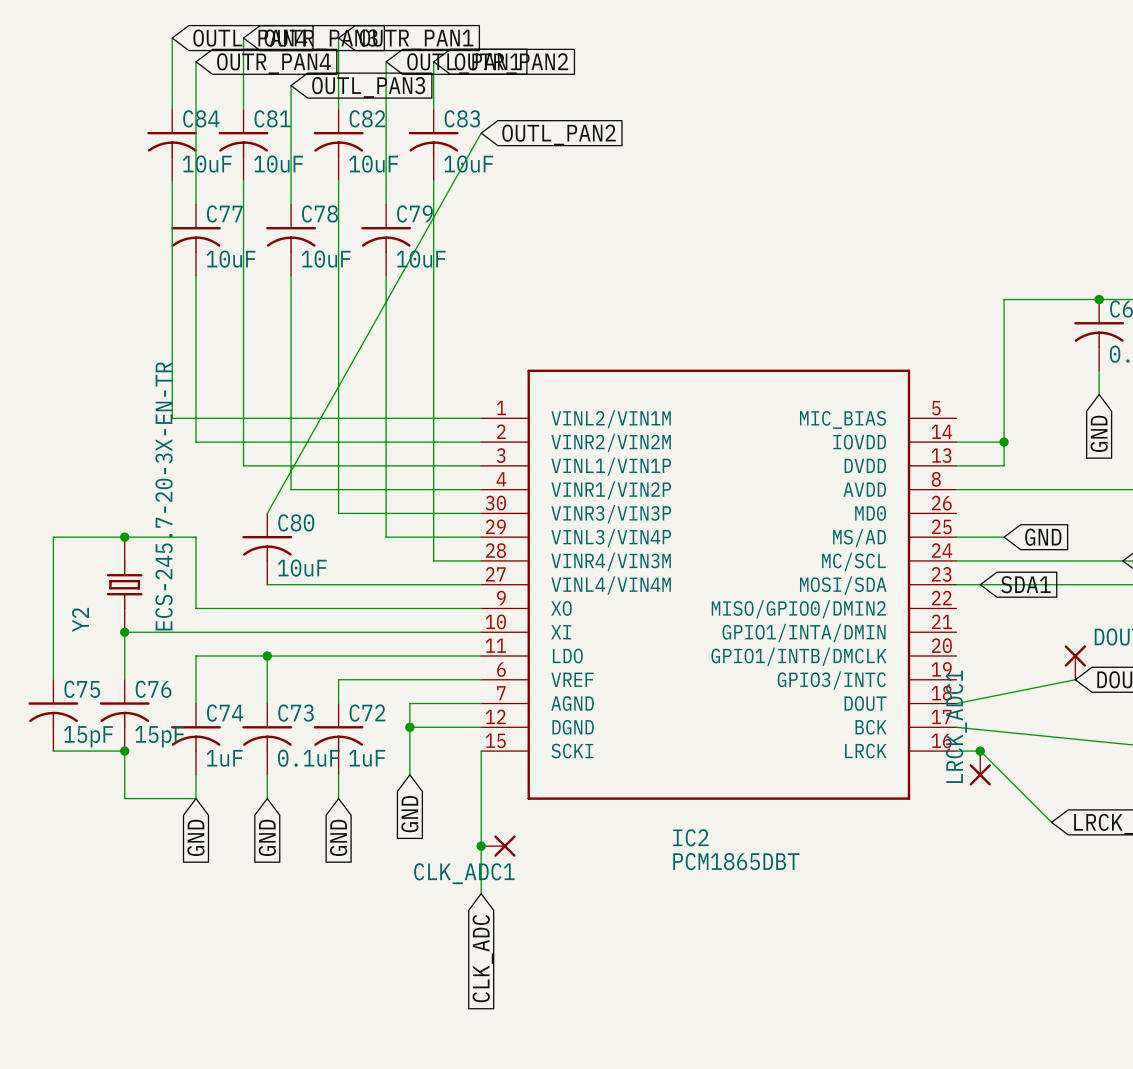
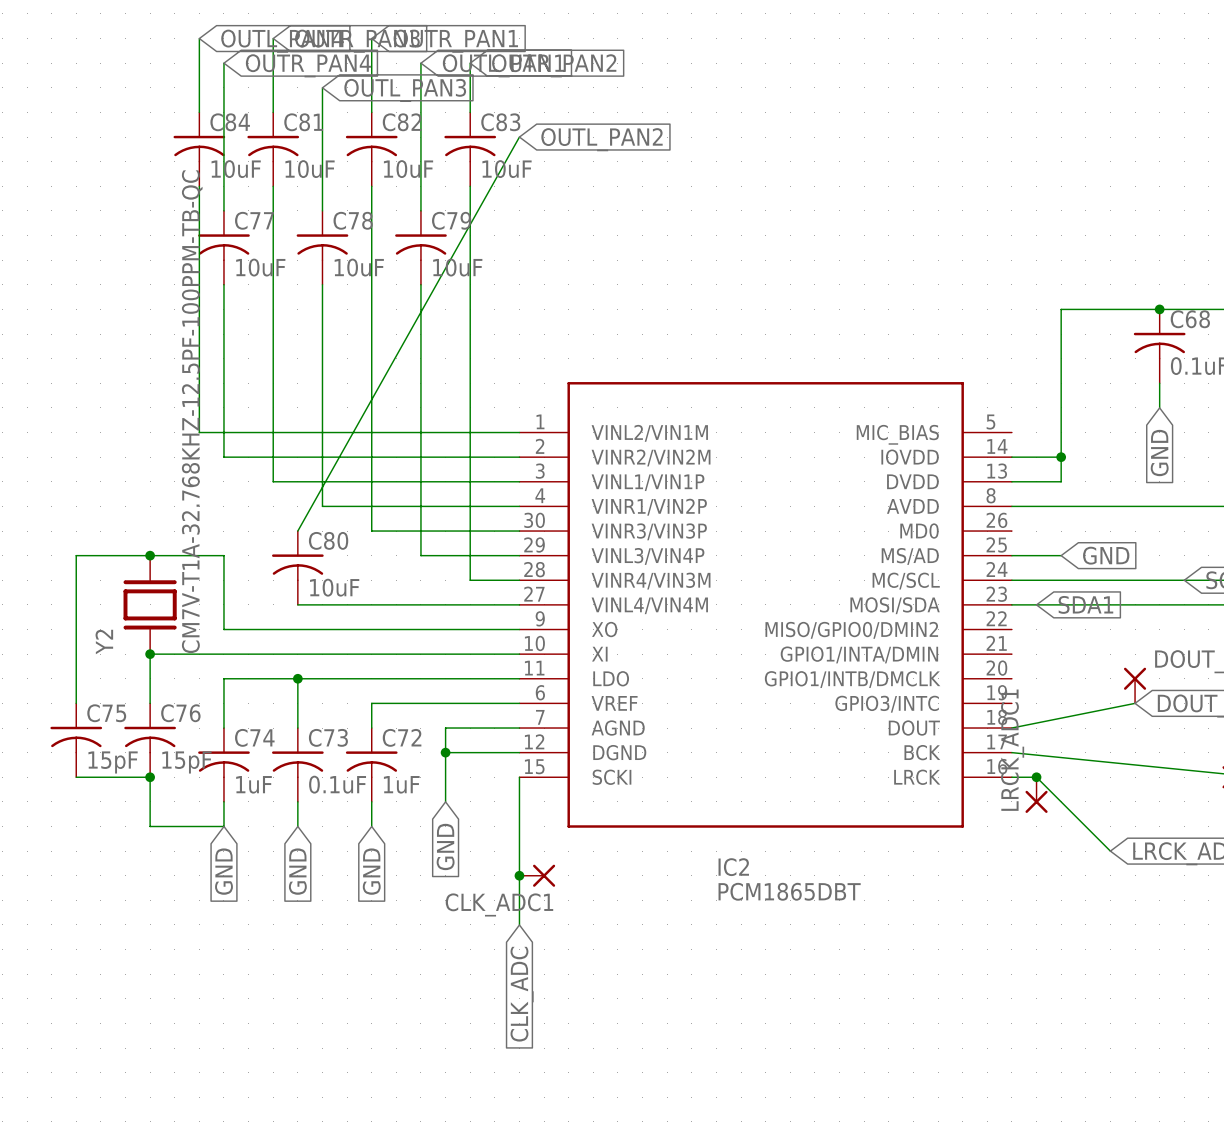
Y2 value: ECS-245.7-20-3X-EN-TR (164, 496) -> CM7V-T1A-32.768KHZ-12.5PF-100PPM-TB-QC (192, 411)
Y2 symbol: [106, 537, 143, 633] -> [123, 555, 177, 655]

